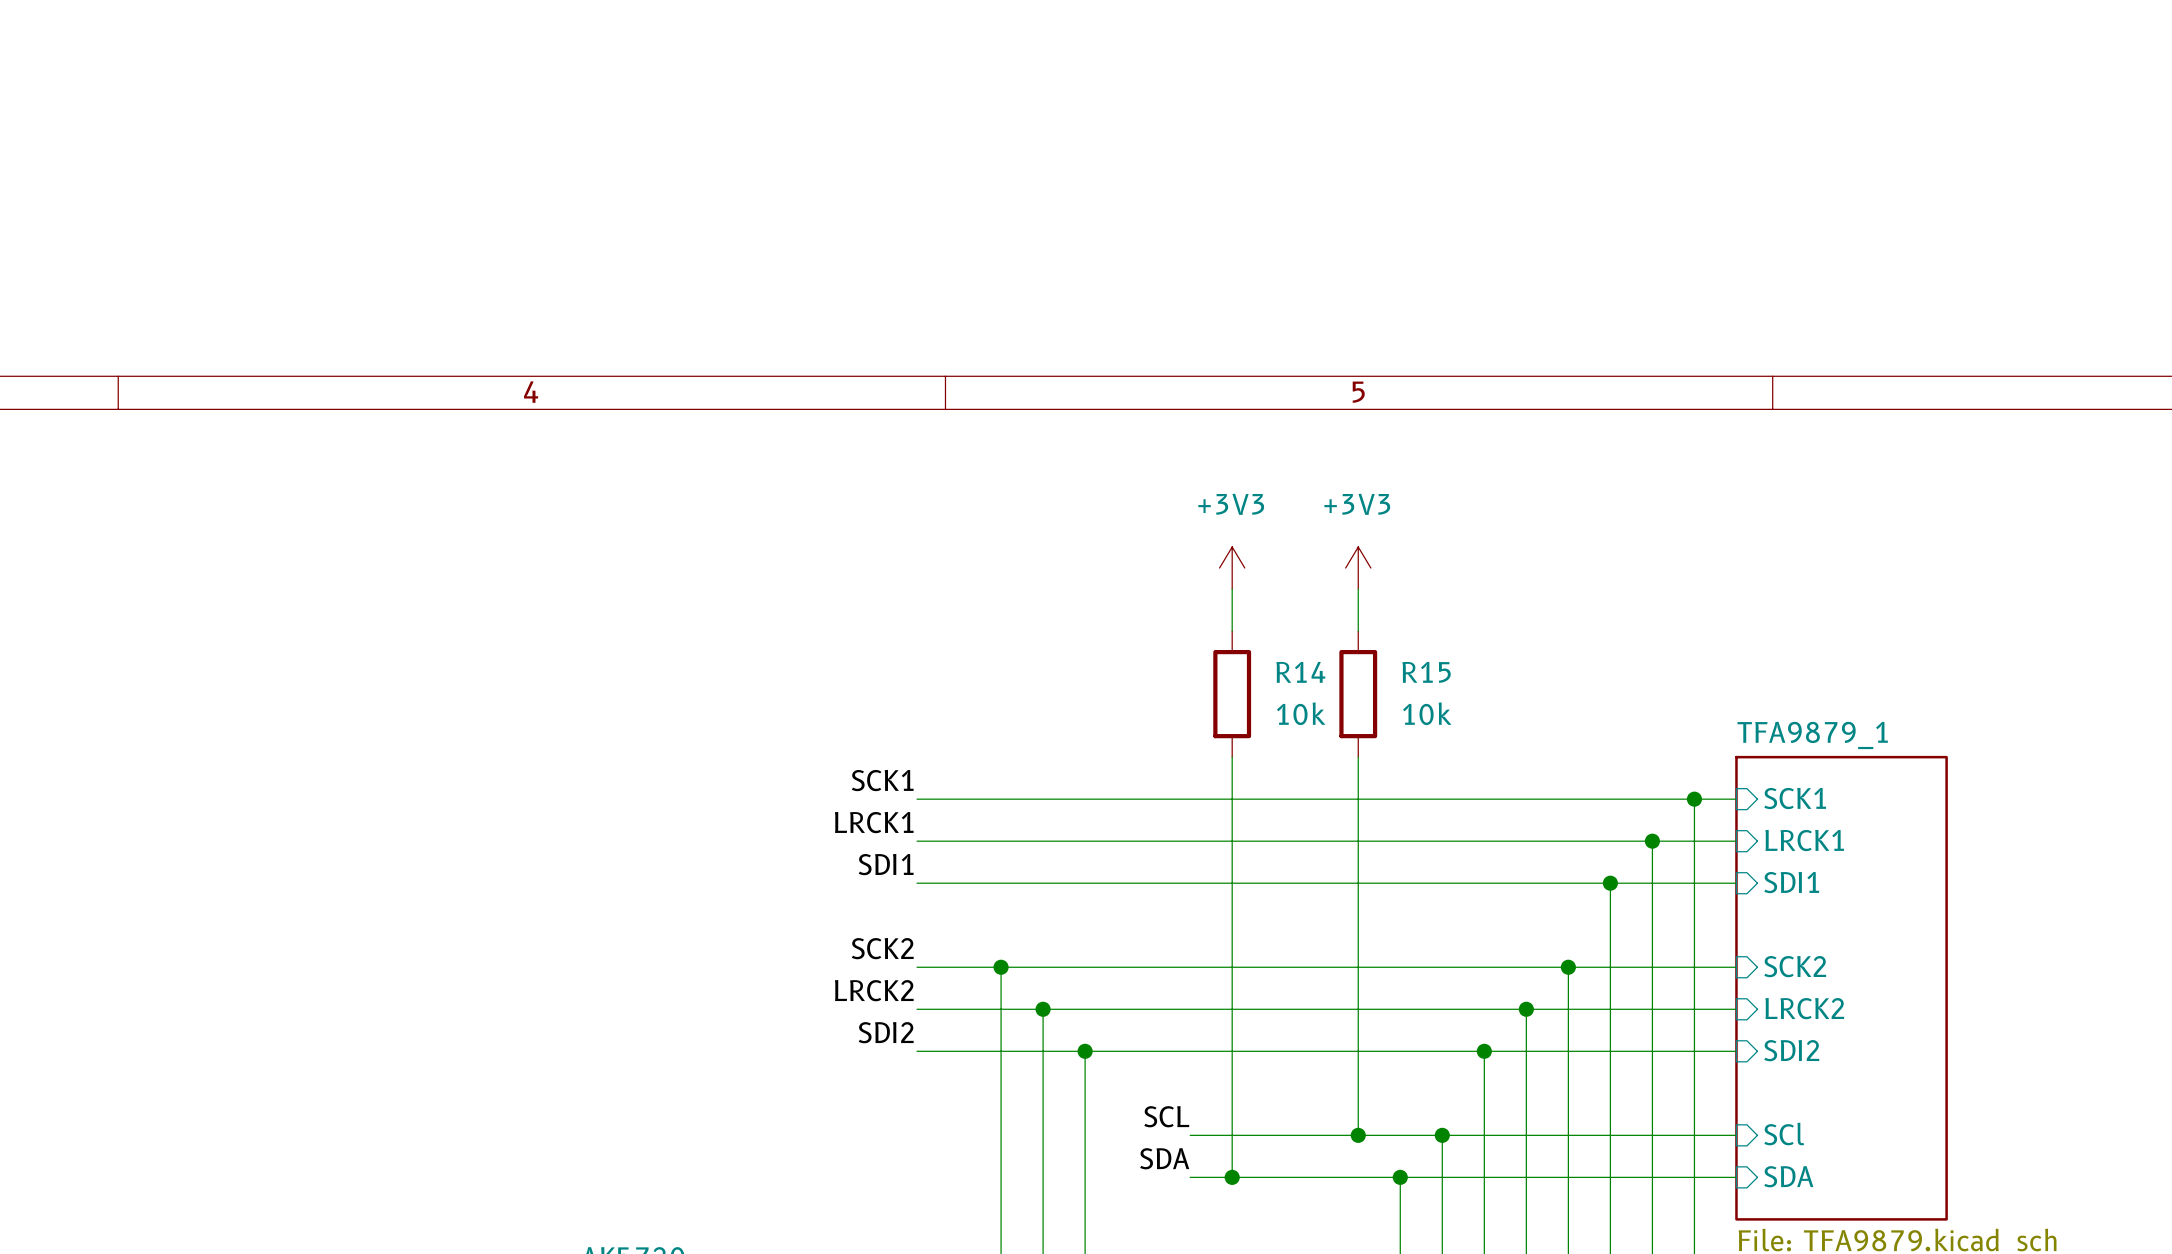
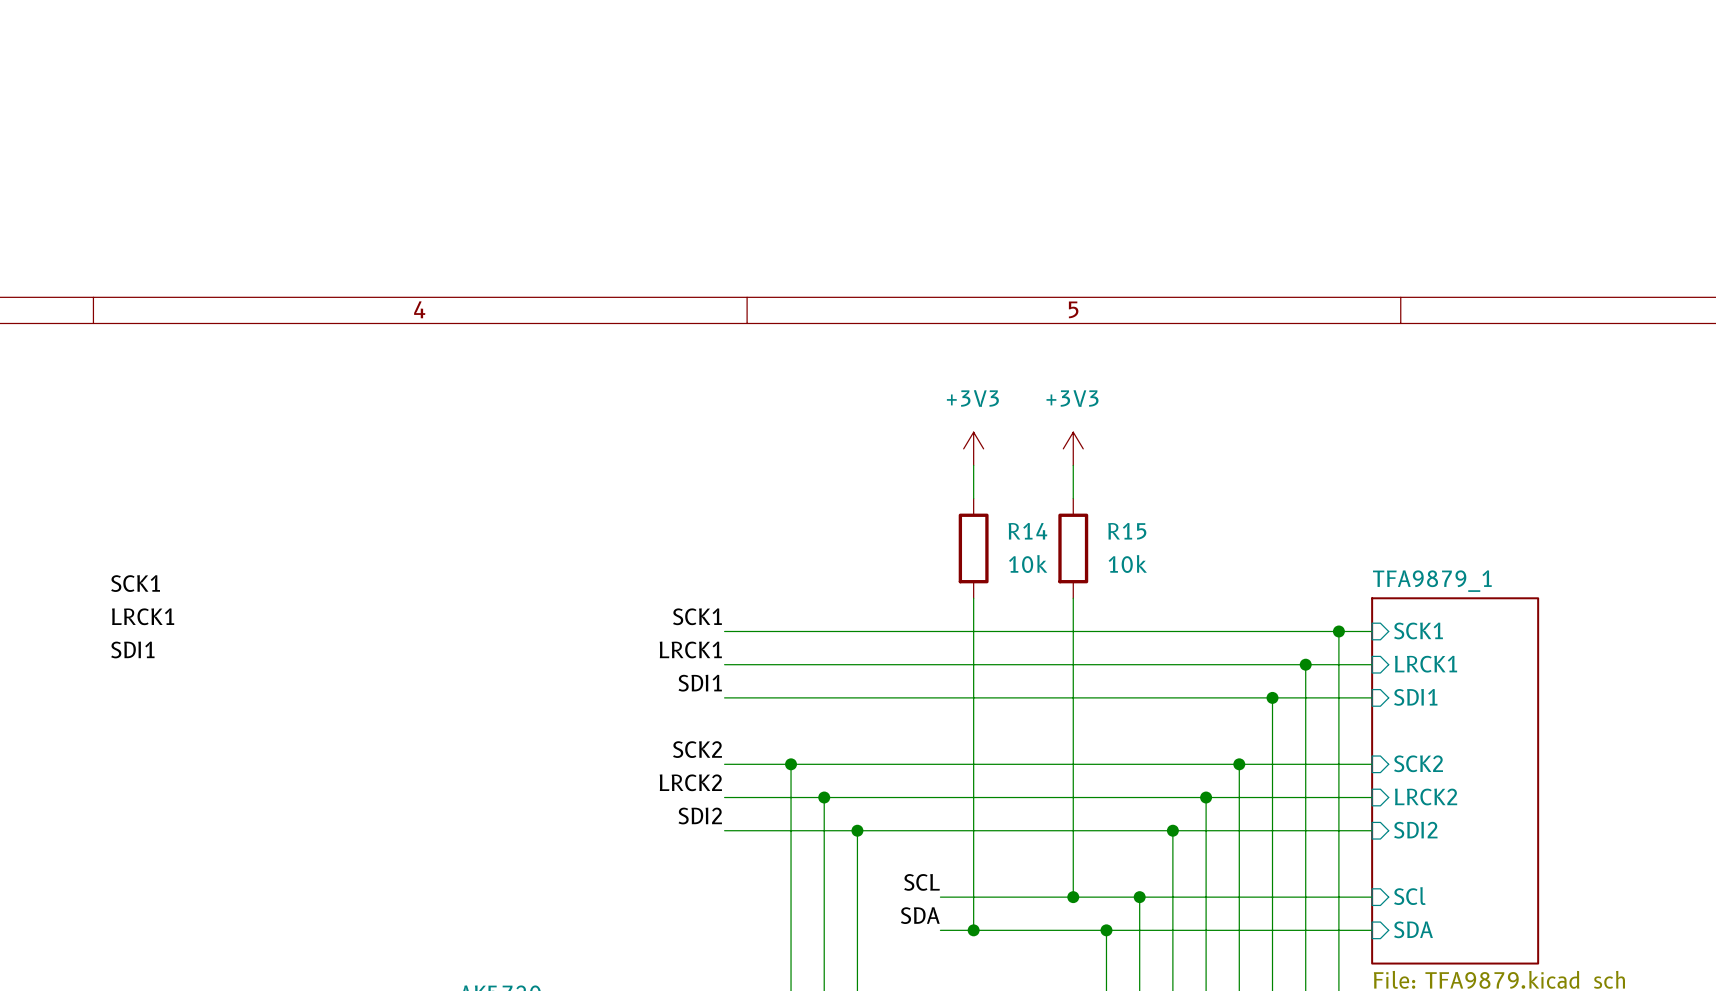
label: none -> SCK1 (135, 583)
label: none -> LRCK1 (143, 616)
label: none -> SDI1 (132, 649)

